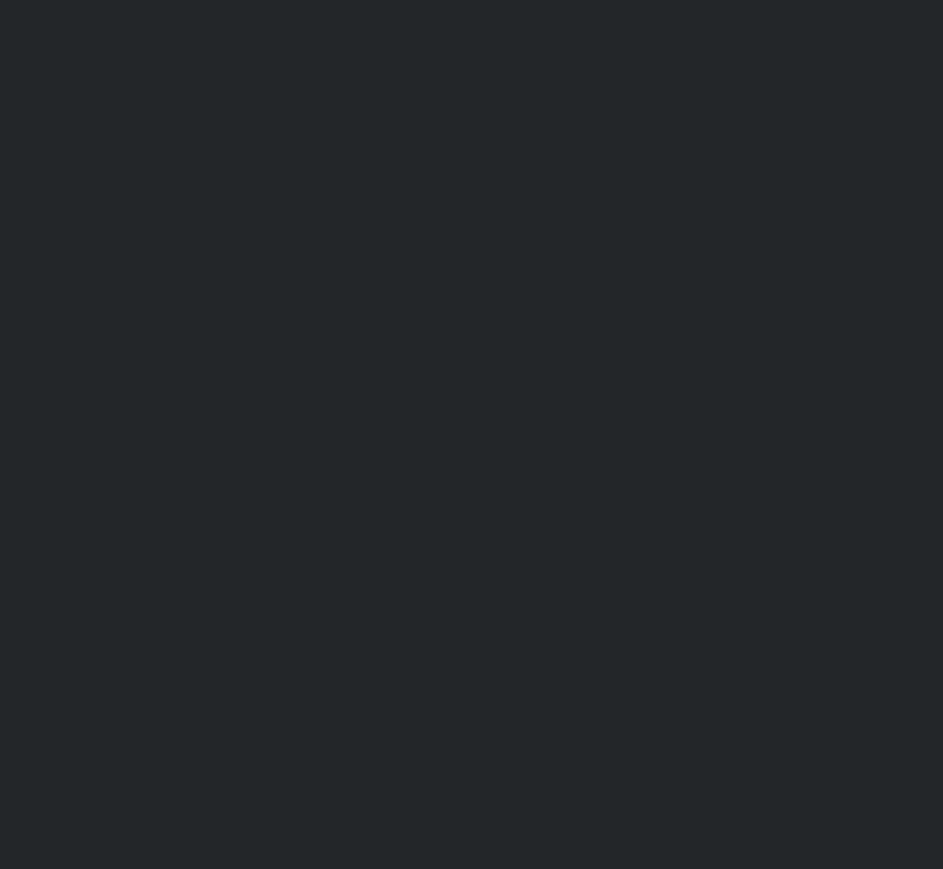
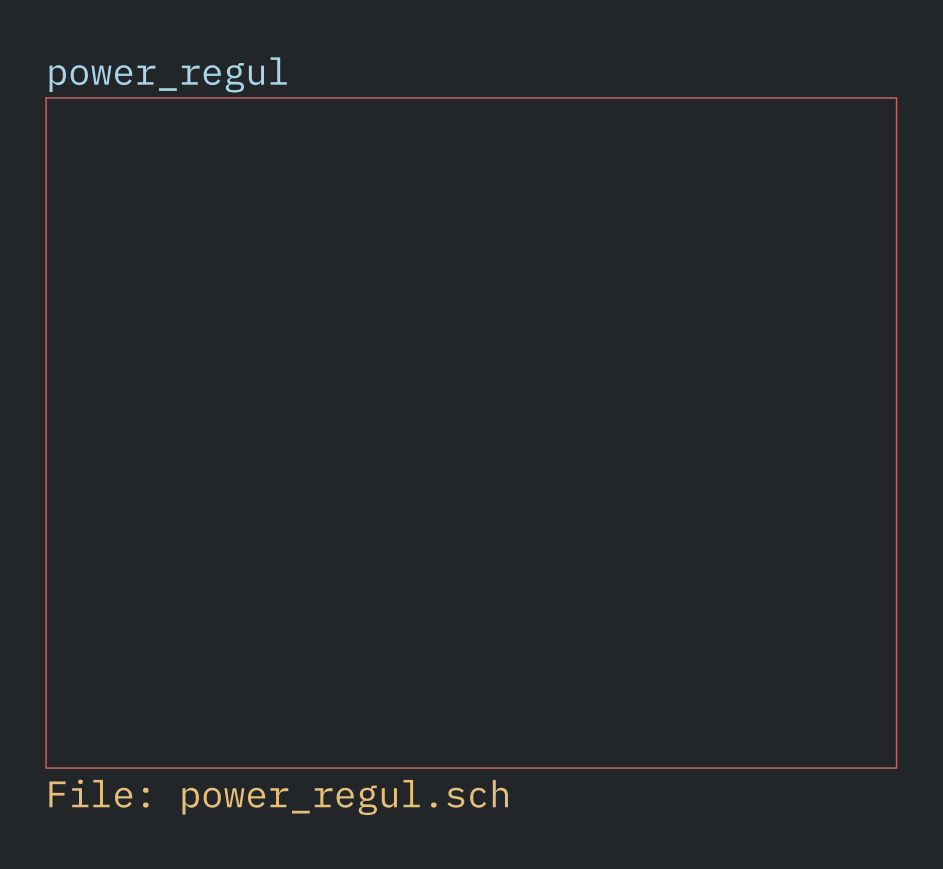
sheet power_regul: none -> File: power_regul.sch (471, 433)

